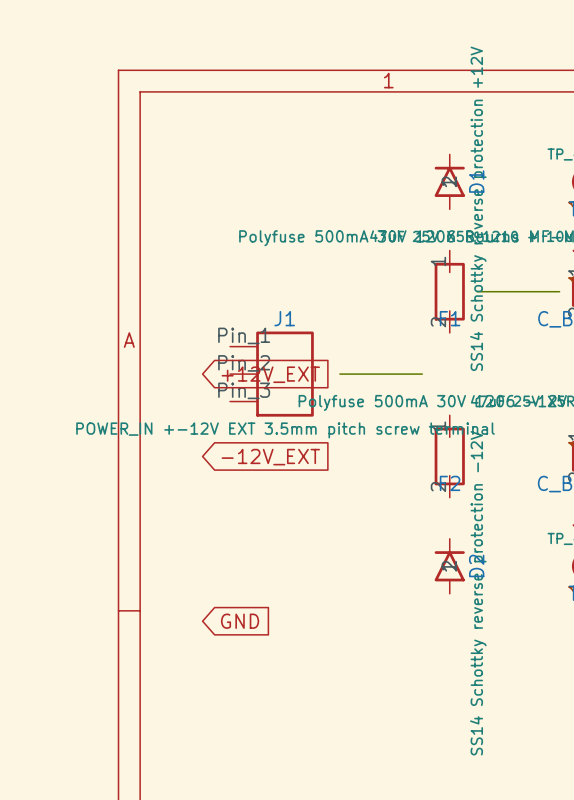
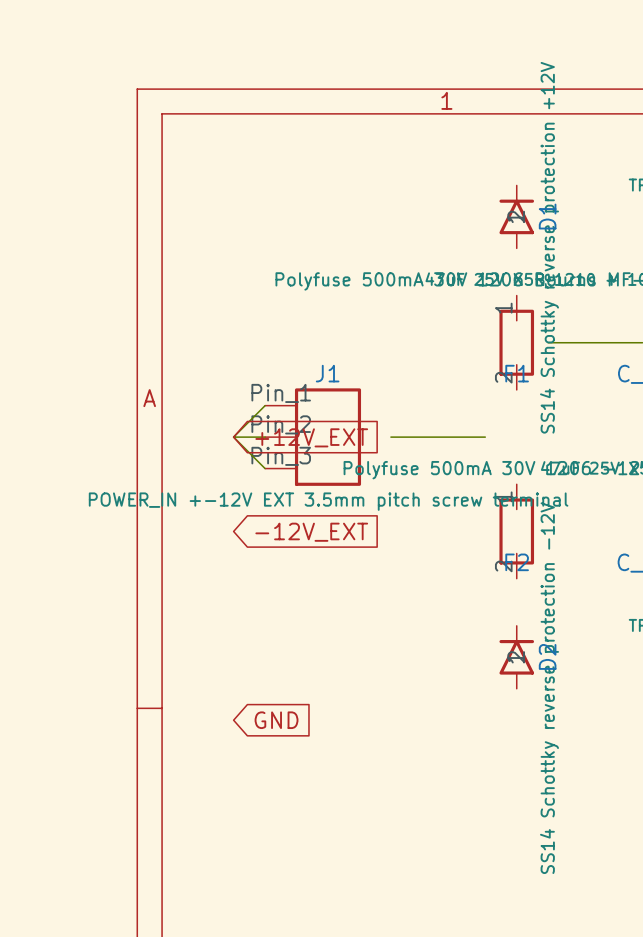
wire: none -> (265, 405) (233, 437)
wire: none -> (233, 437) (265, 437)
wire: none -> (233, 437) (265, 468)

